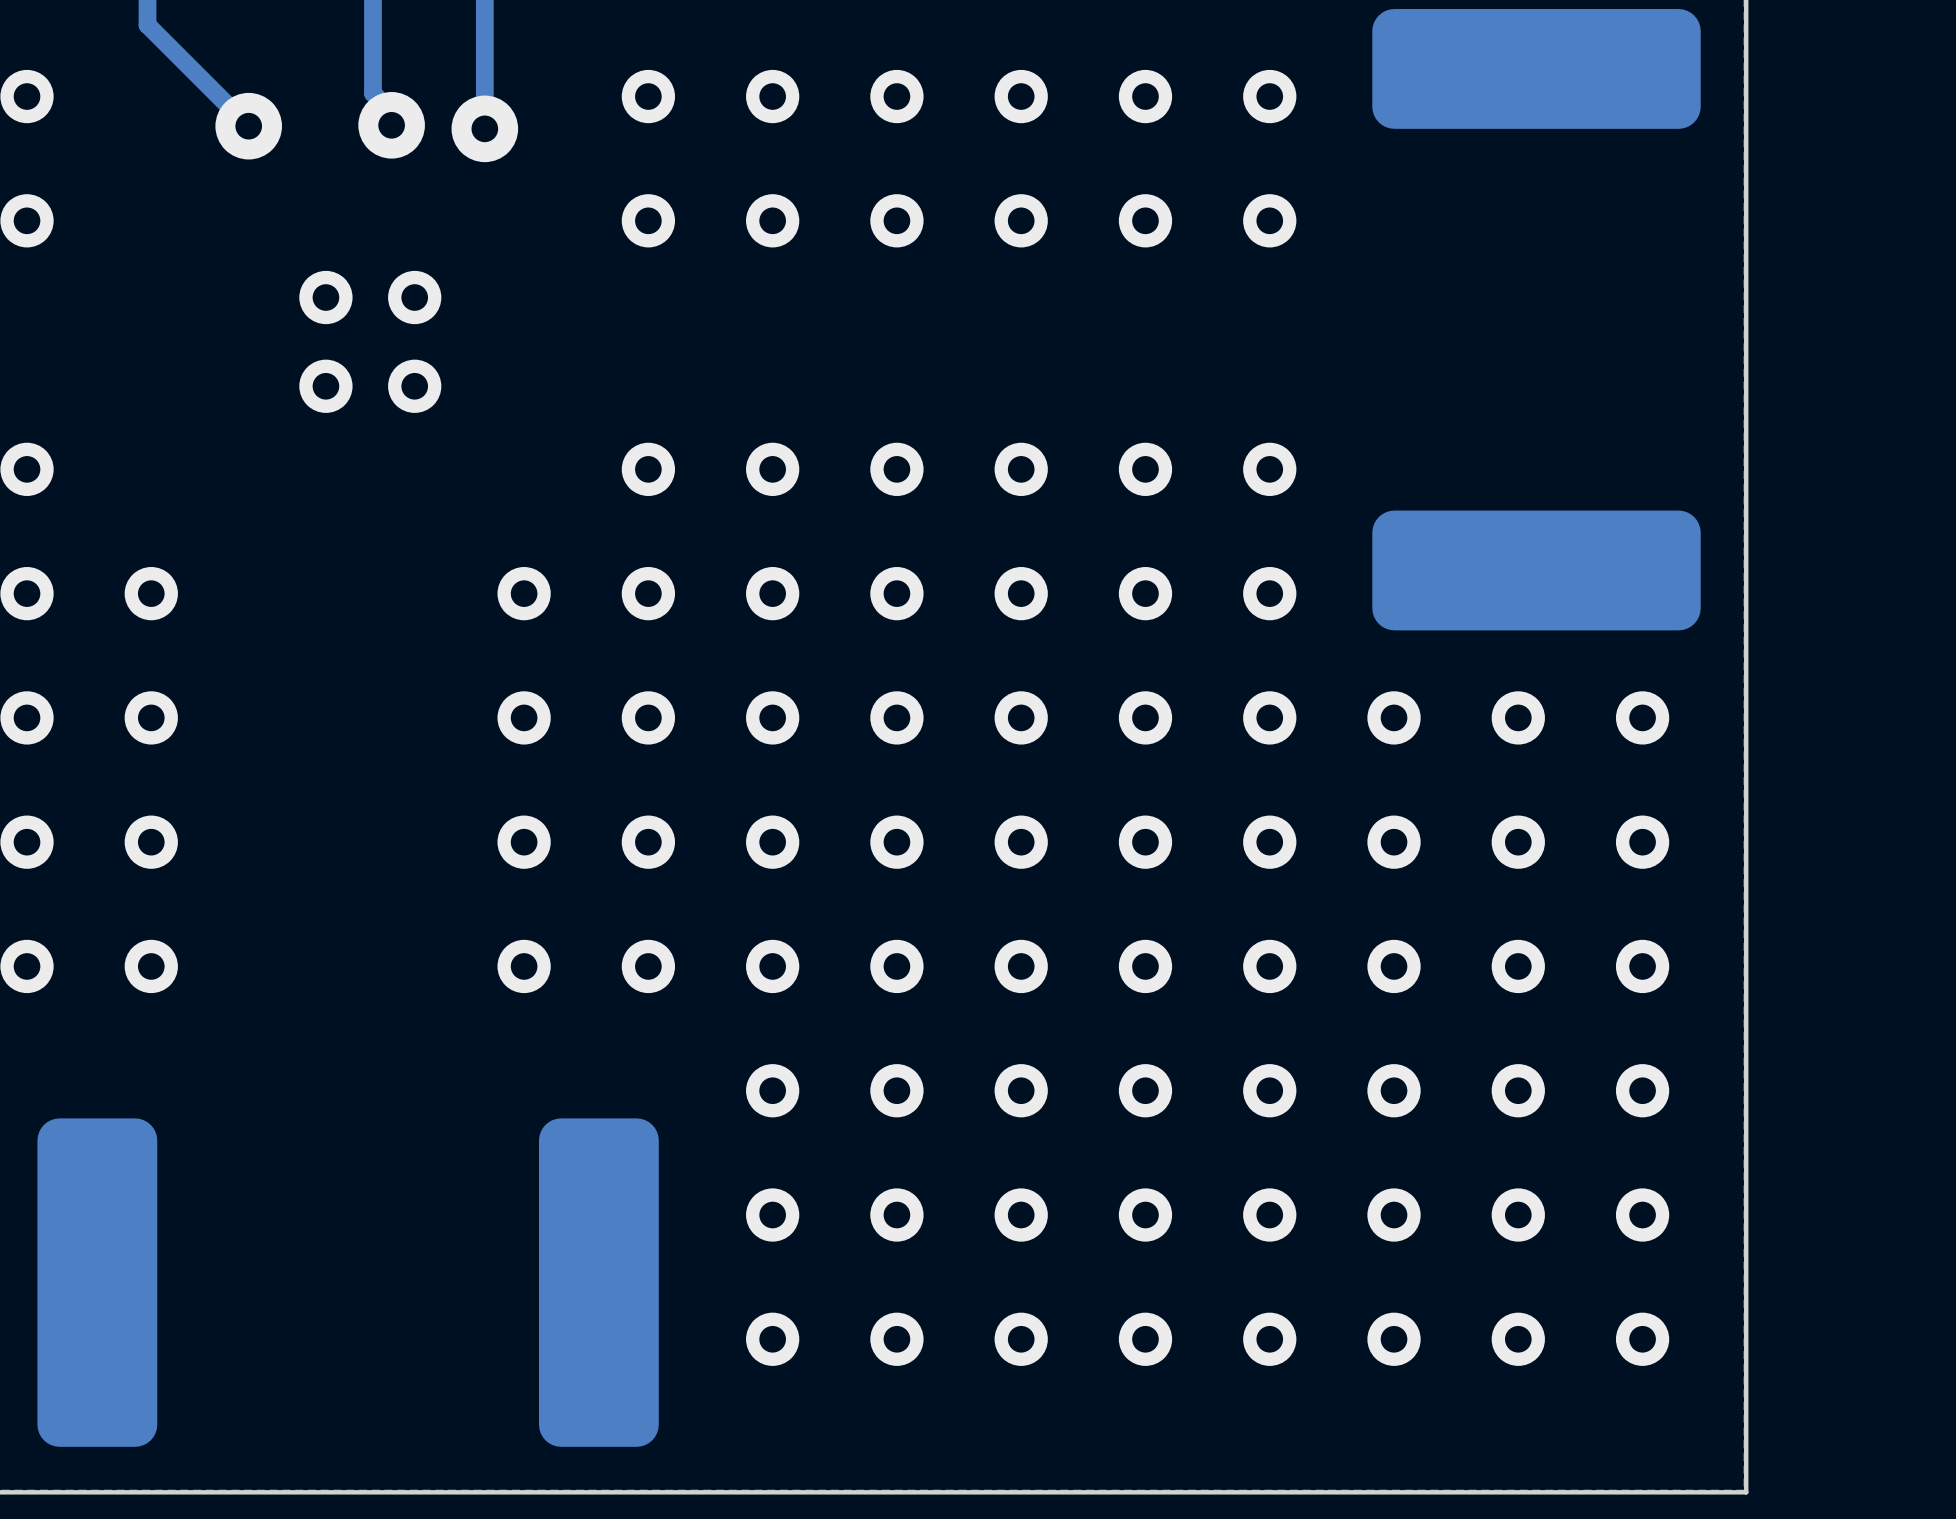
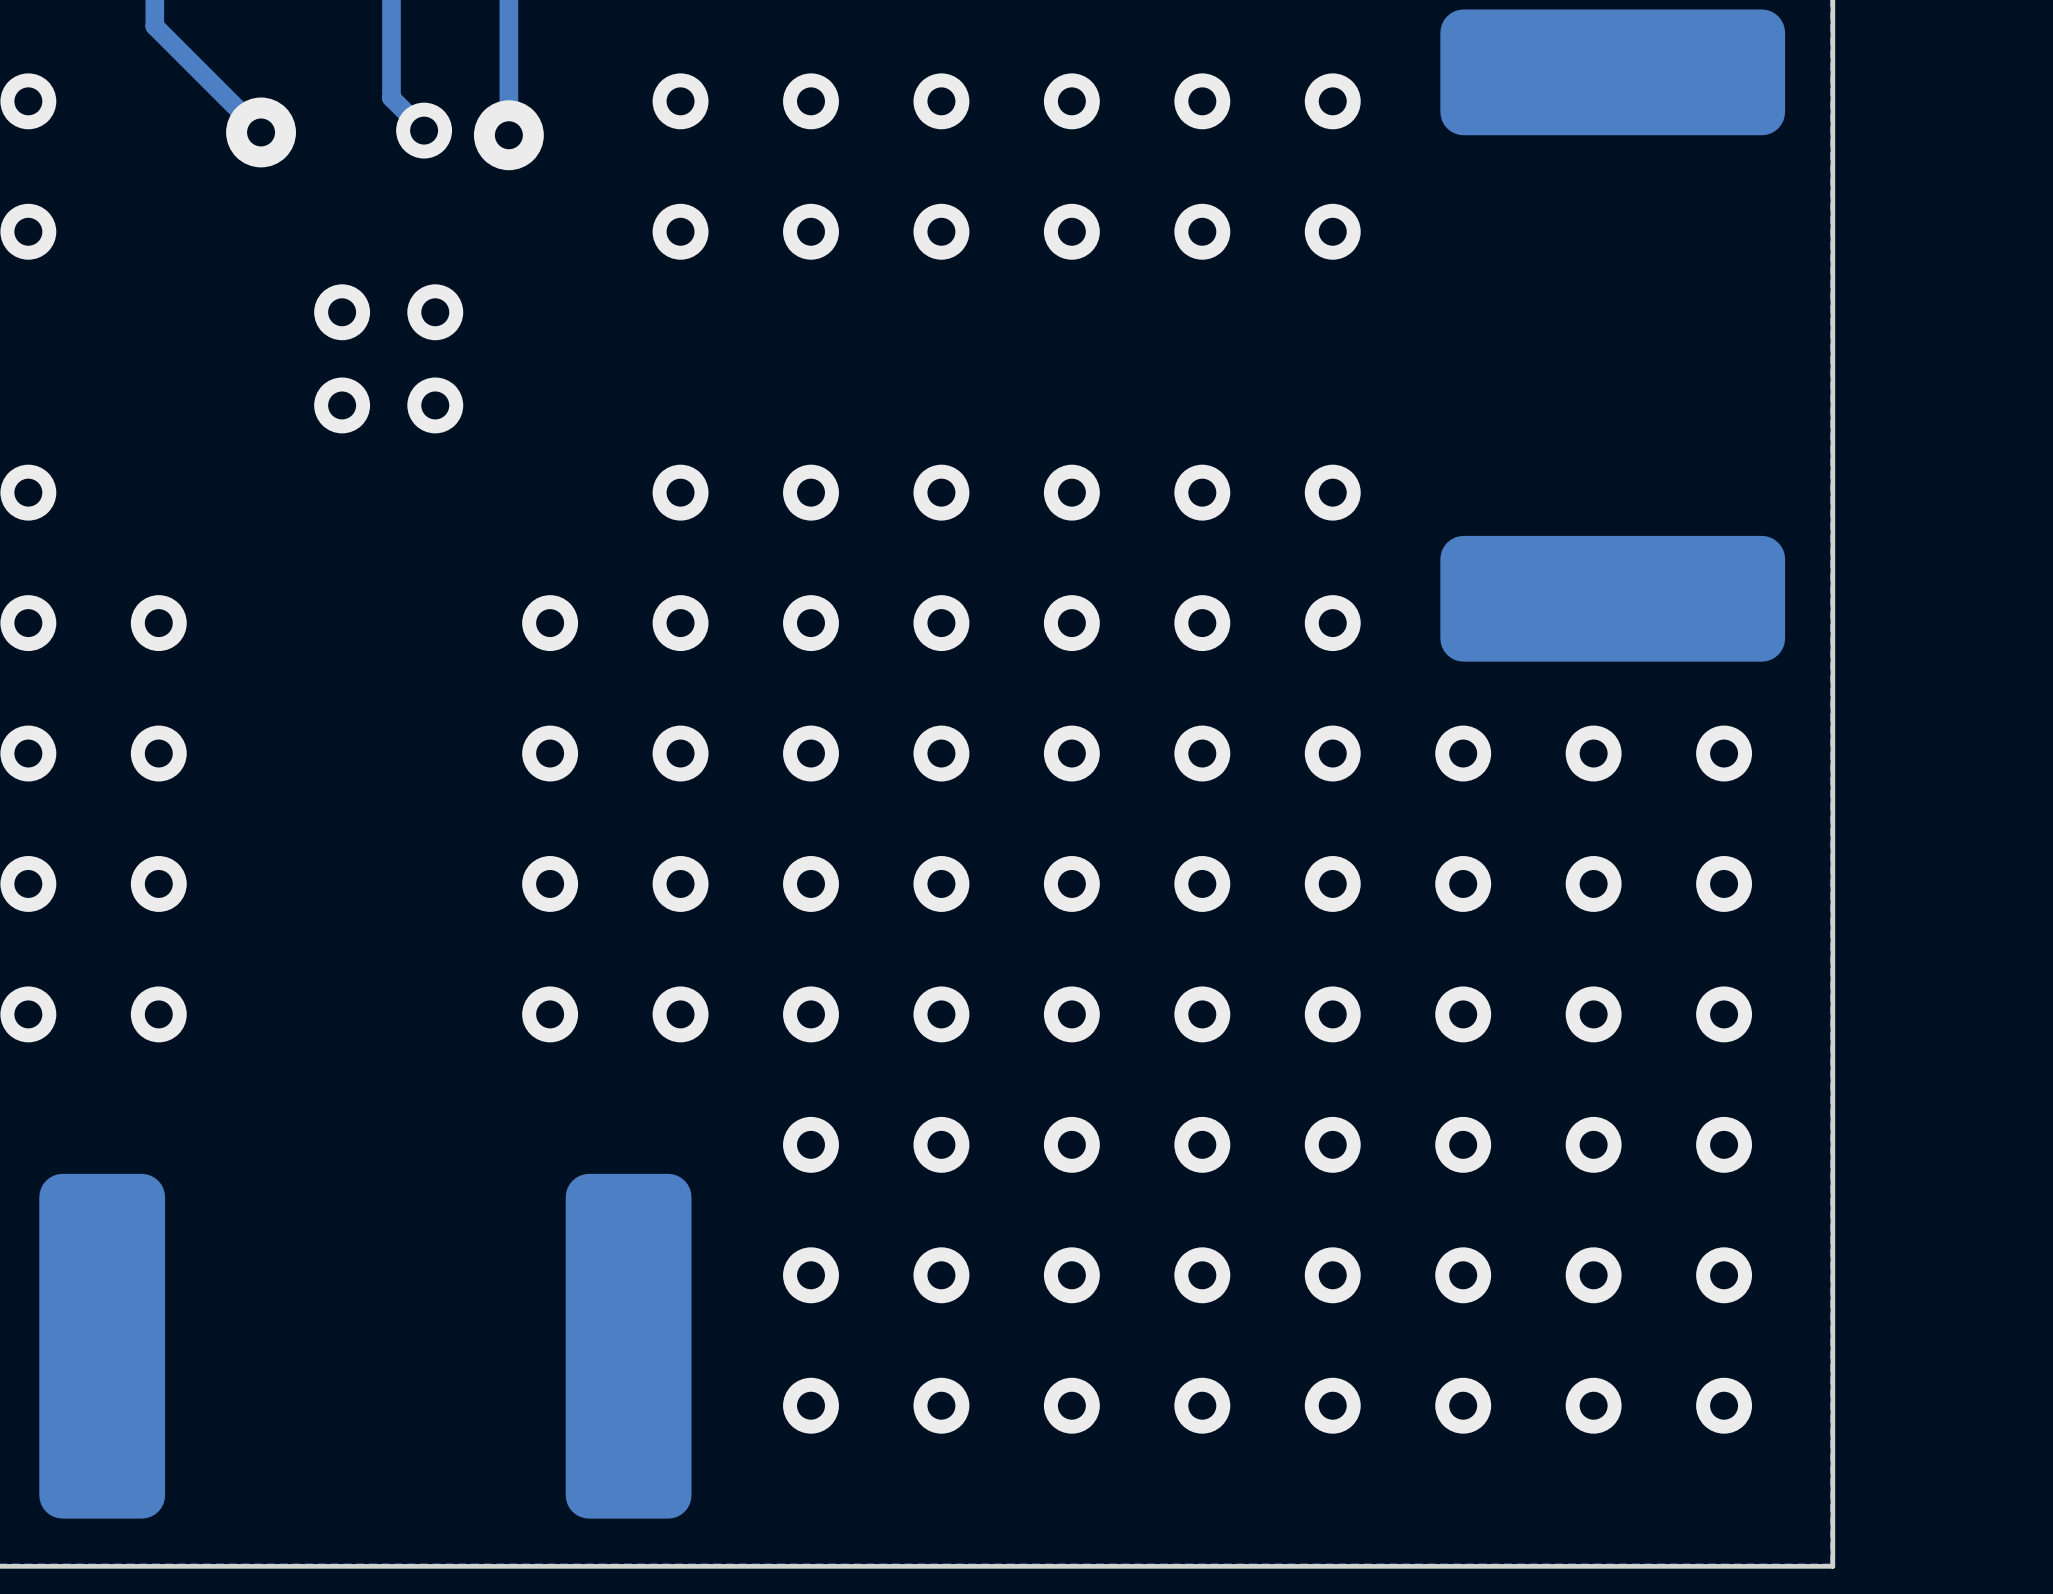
via size: [358, 92, 425, 159] -> [396, 102, 453, 159]

